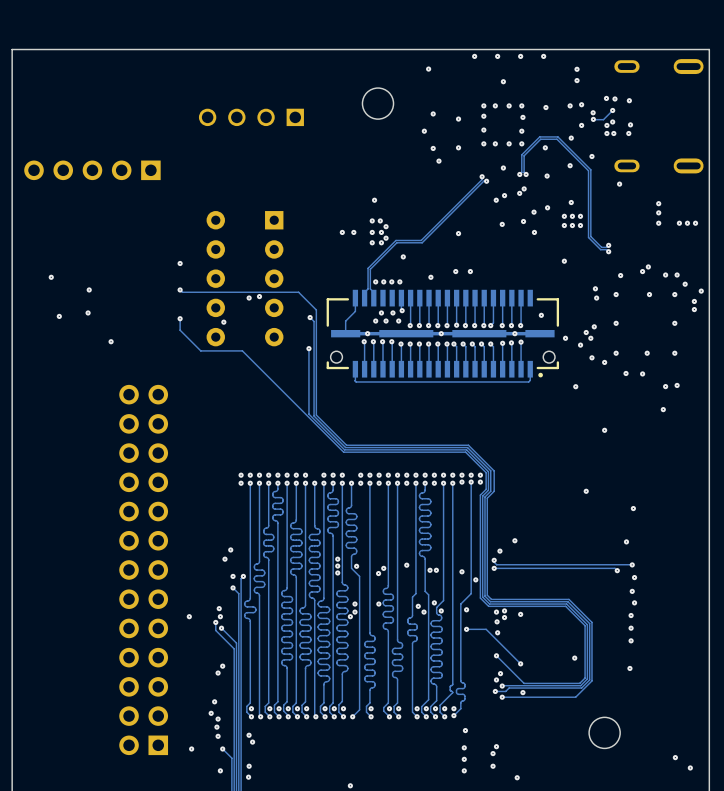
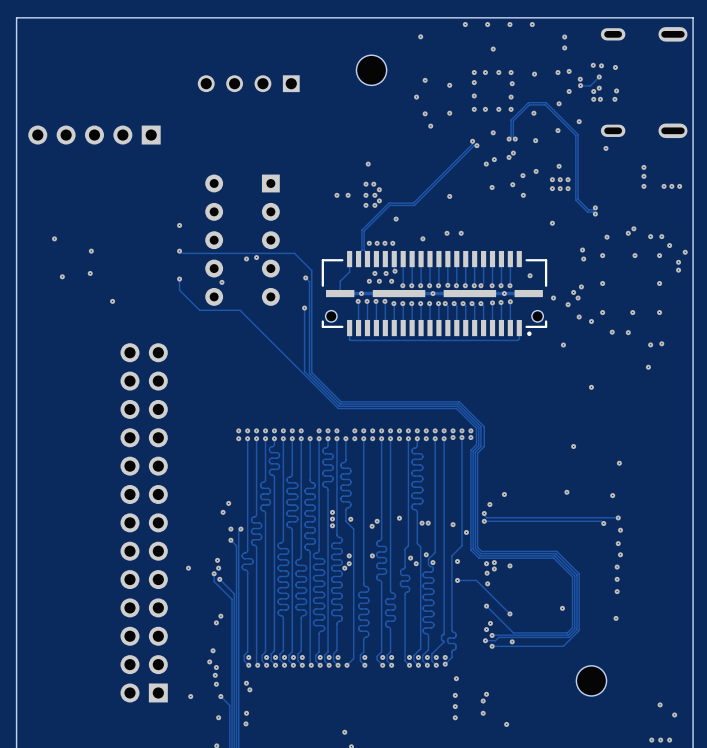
via: none -> (566, 492)

